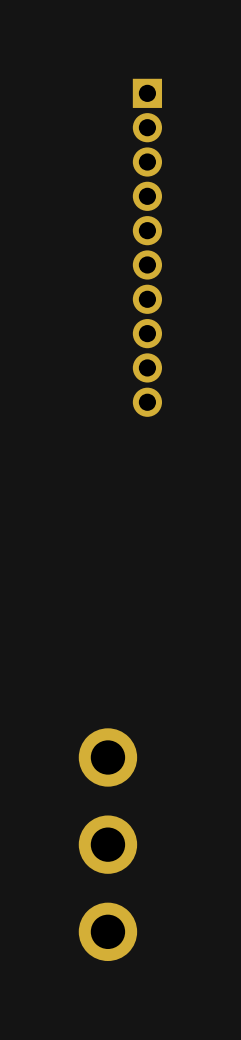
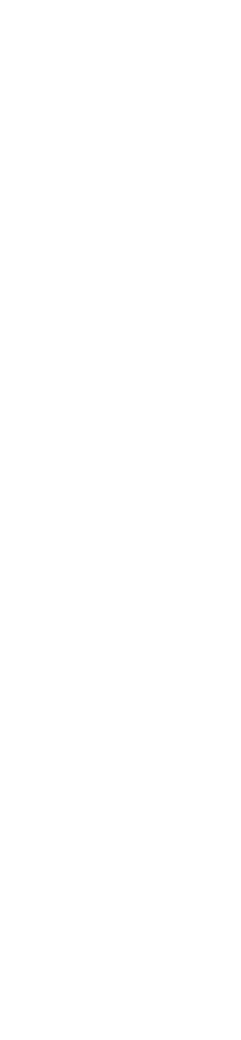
part: (147, 247) -> none
part: (107, 844) -> none

